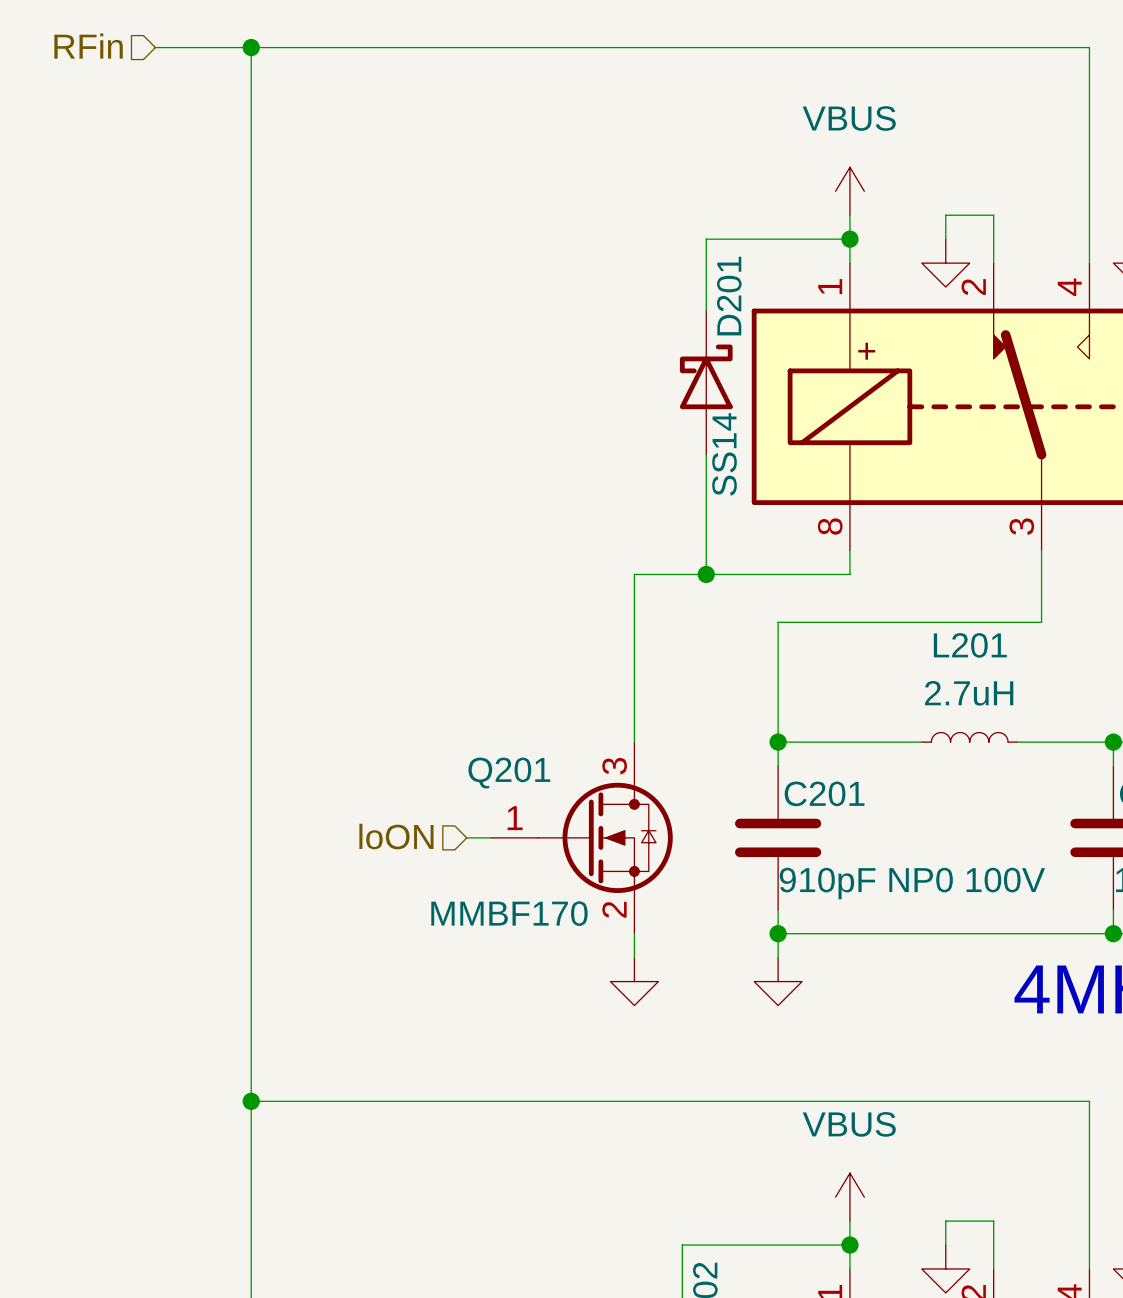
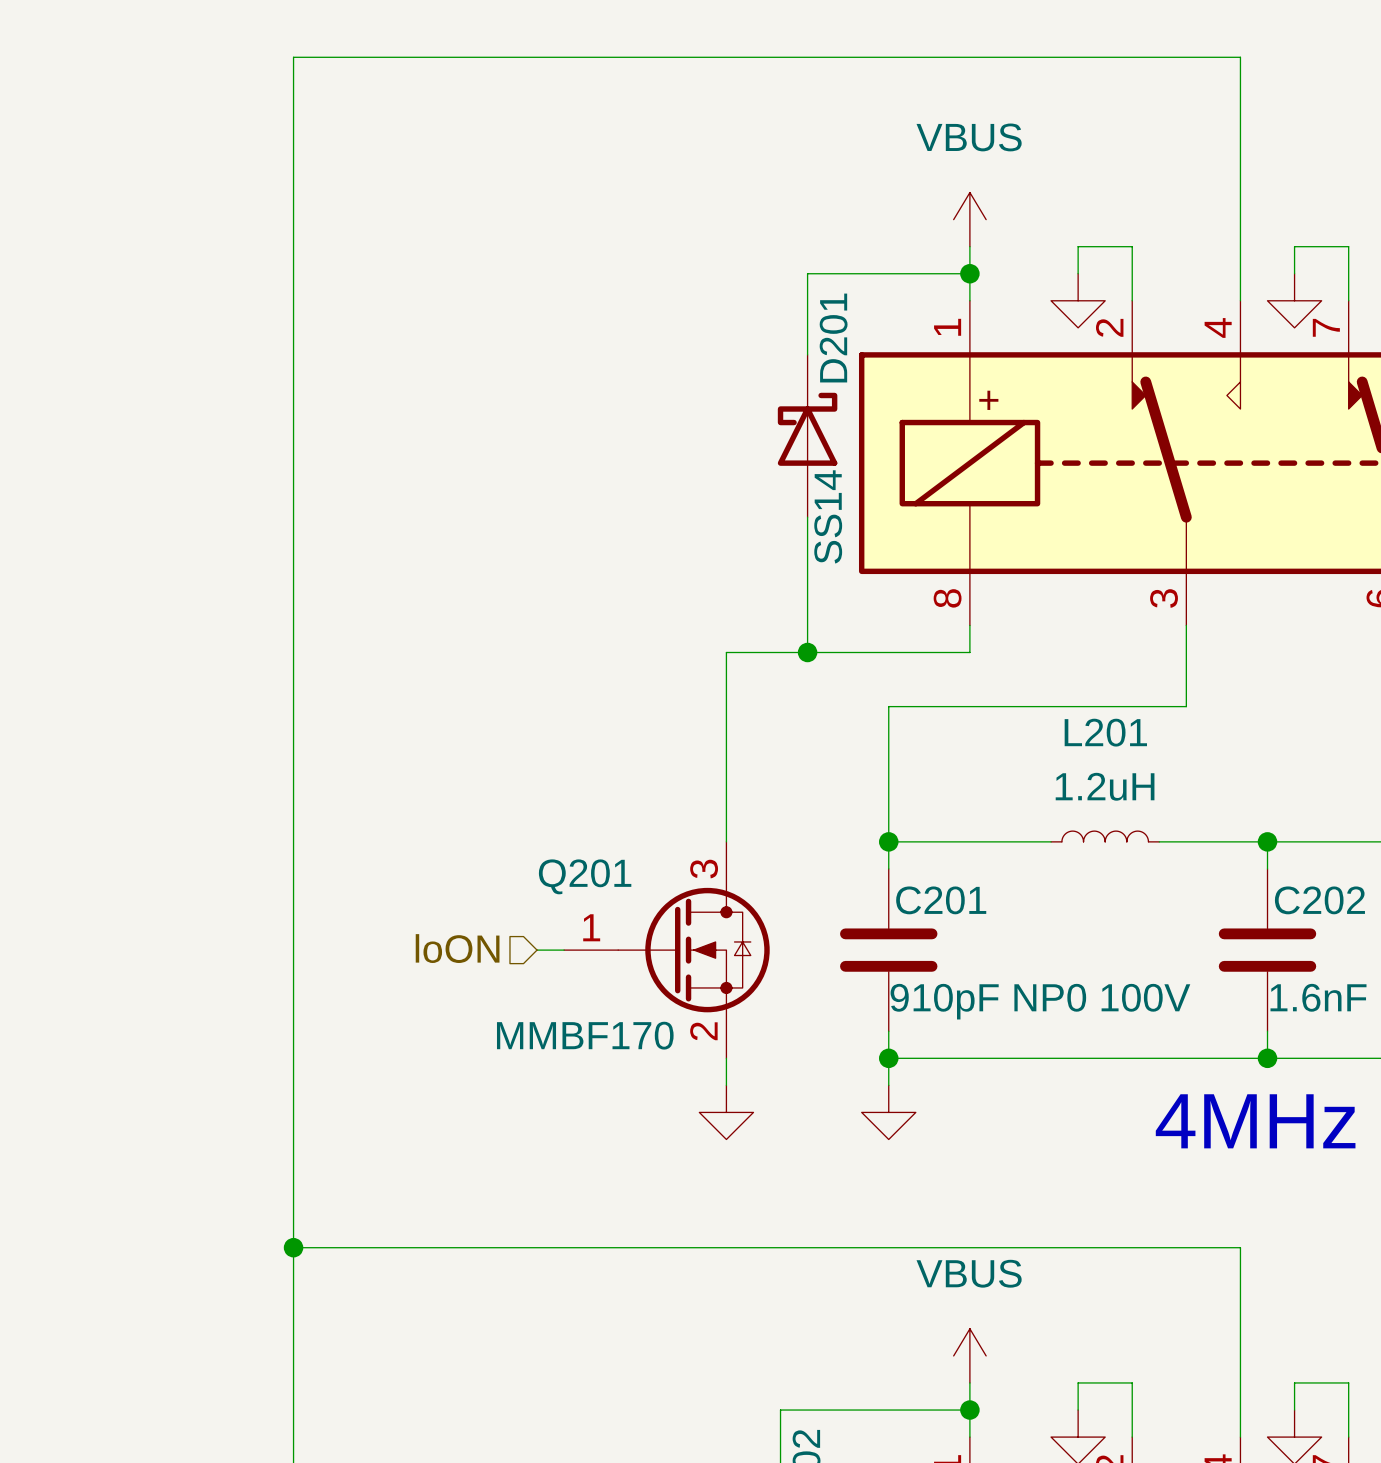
hierarchical label: RFin (88, 46) -> none
wire: (155, 47) (251, 47) -> none
junction: (251, 47) -> none
L201 value: 2.7uH (969, 693) -> 1.2uH (1105, 786)

